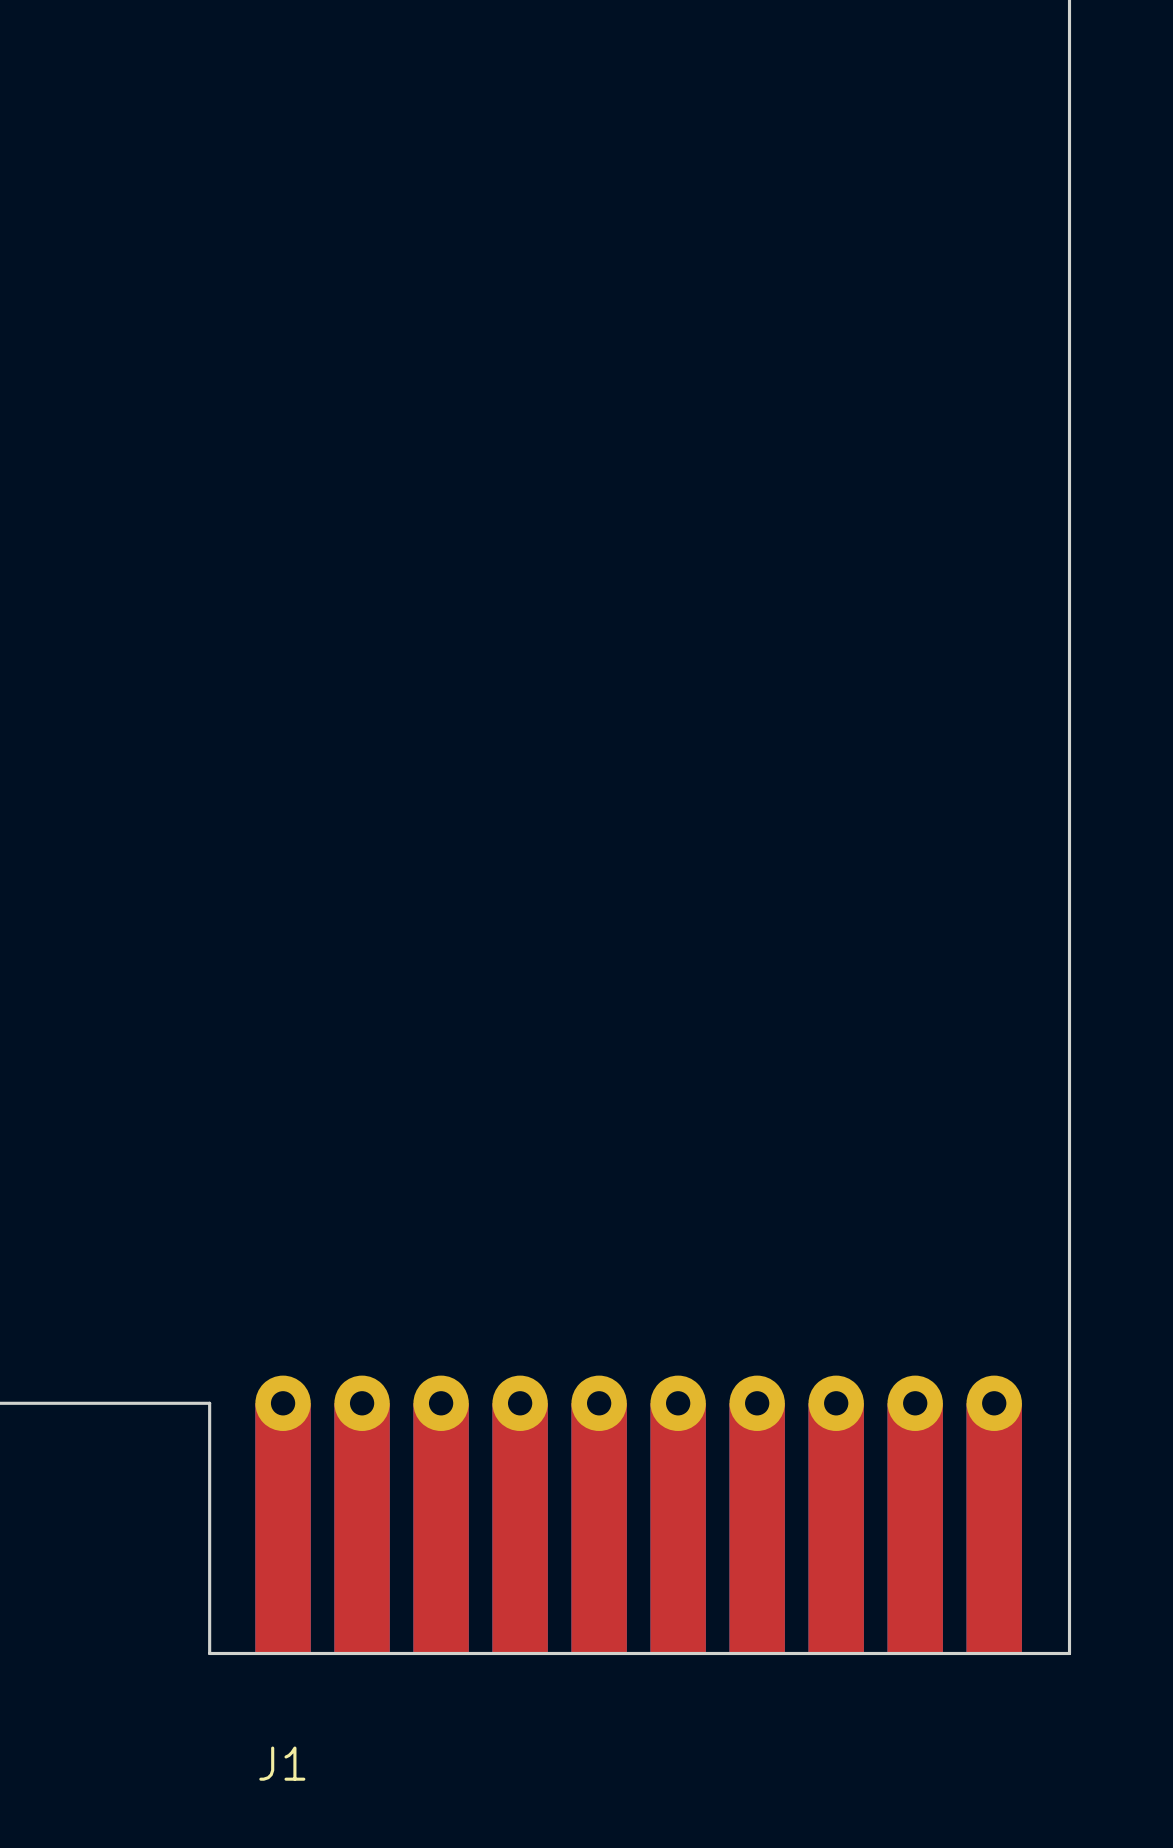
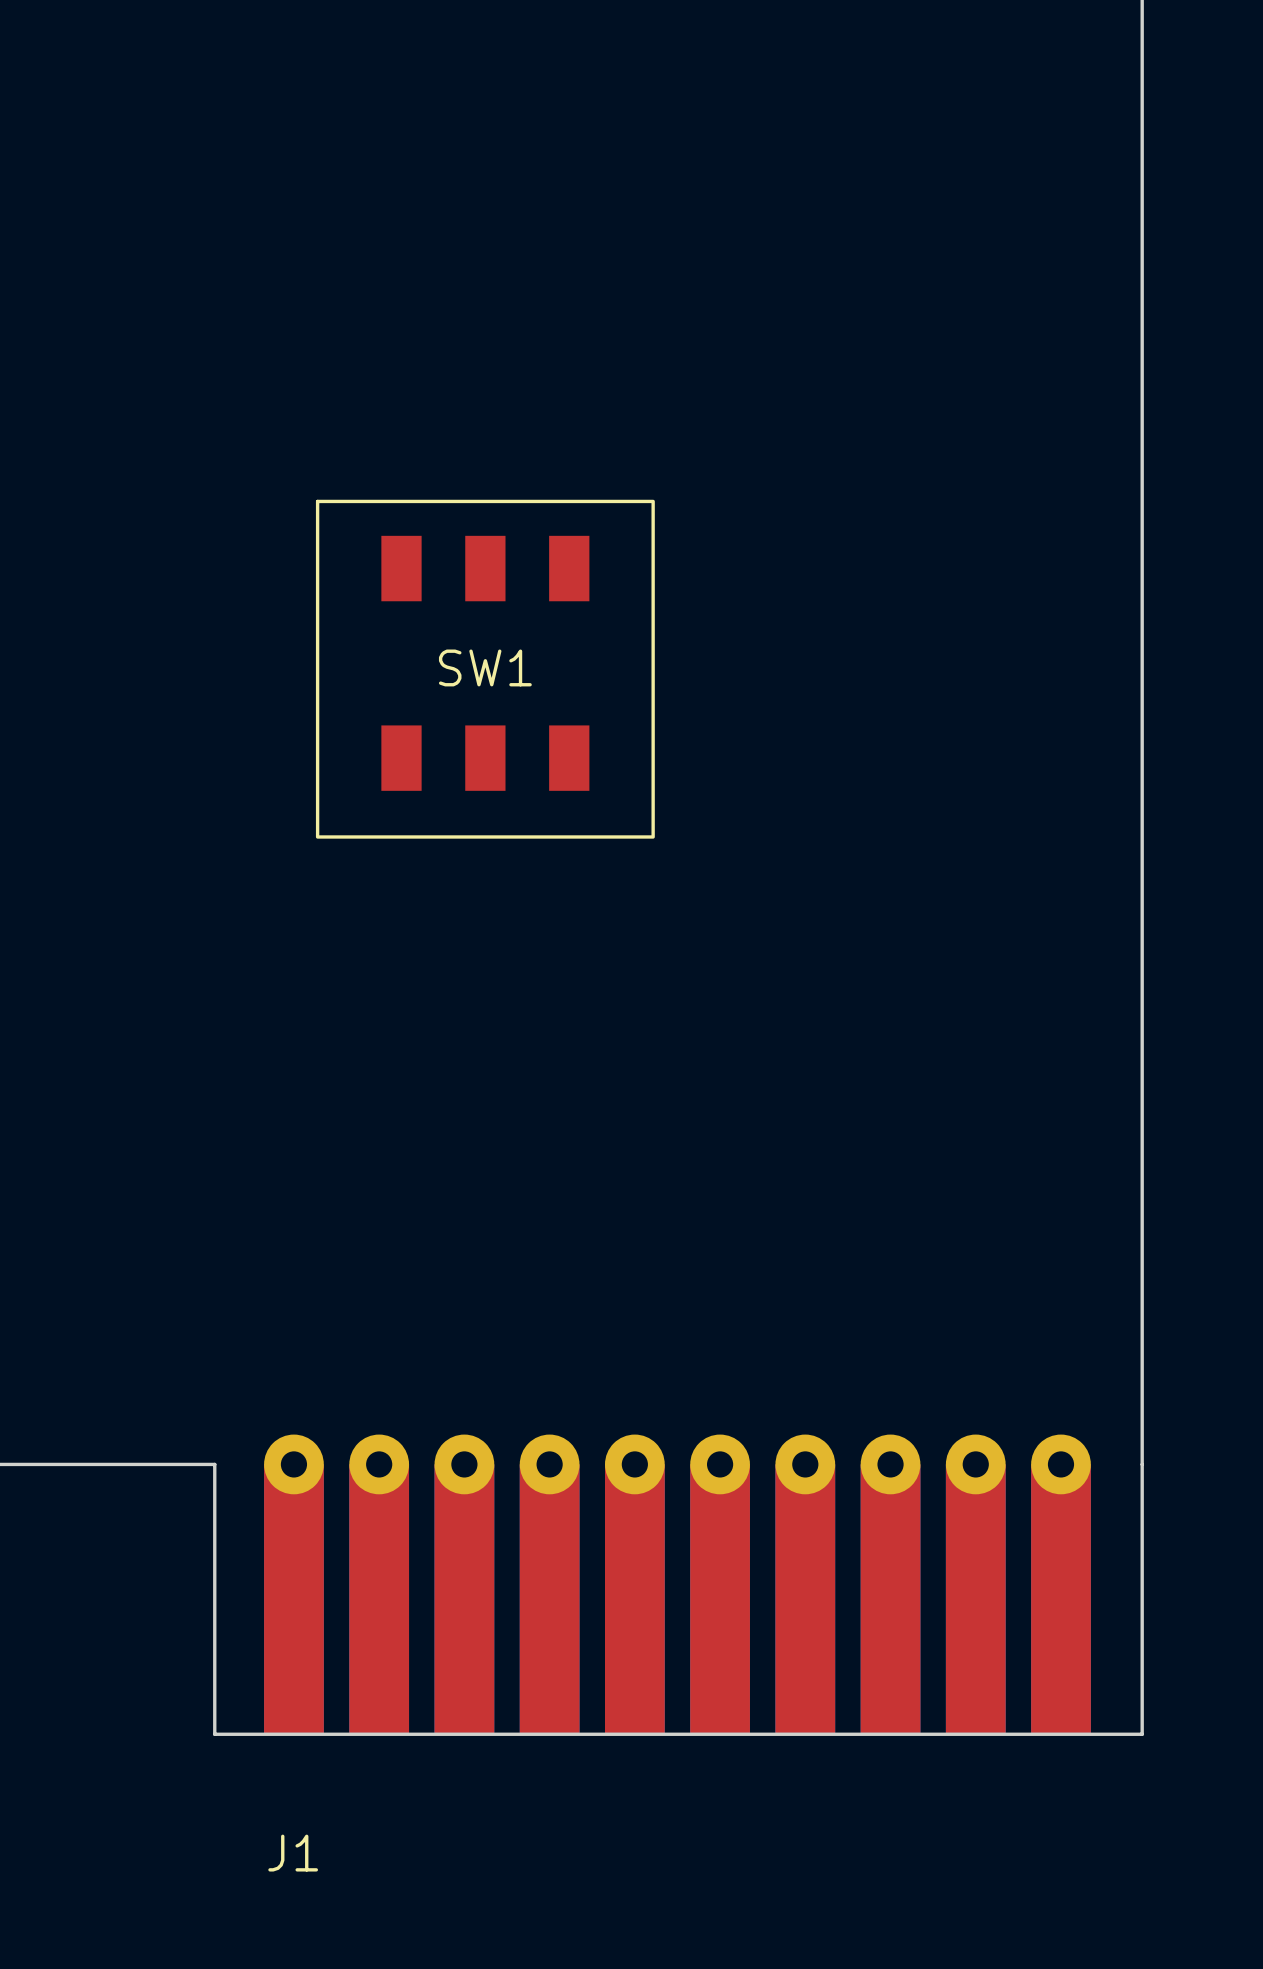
SW1: none -> (485, 669)

